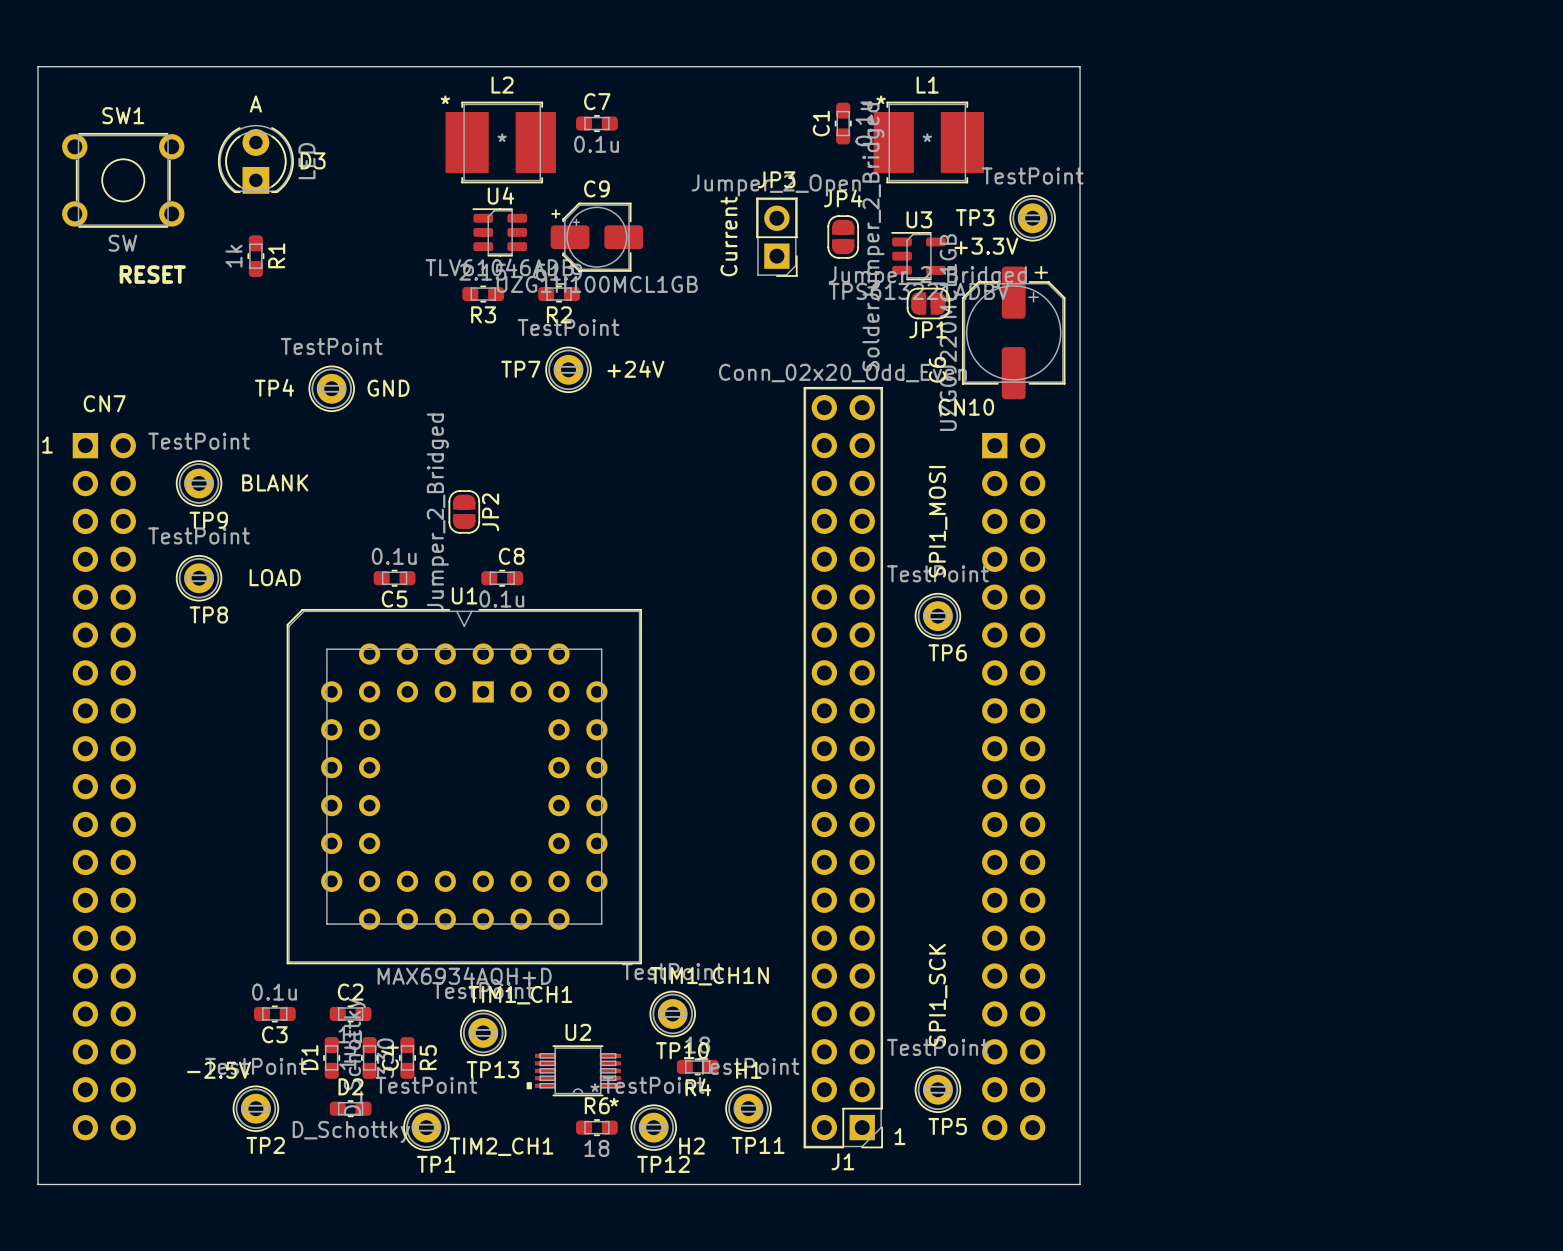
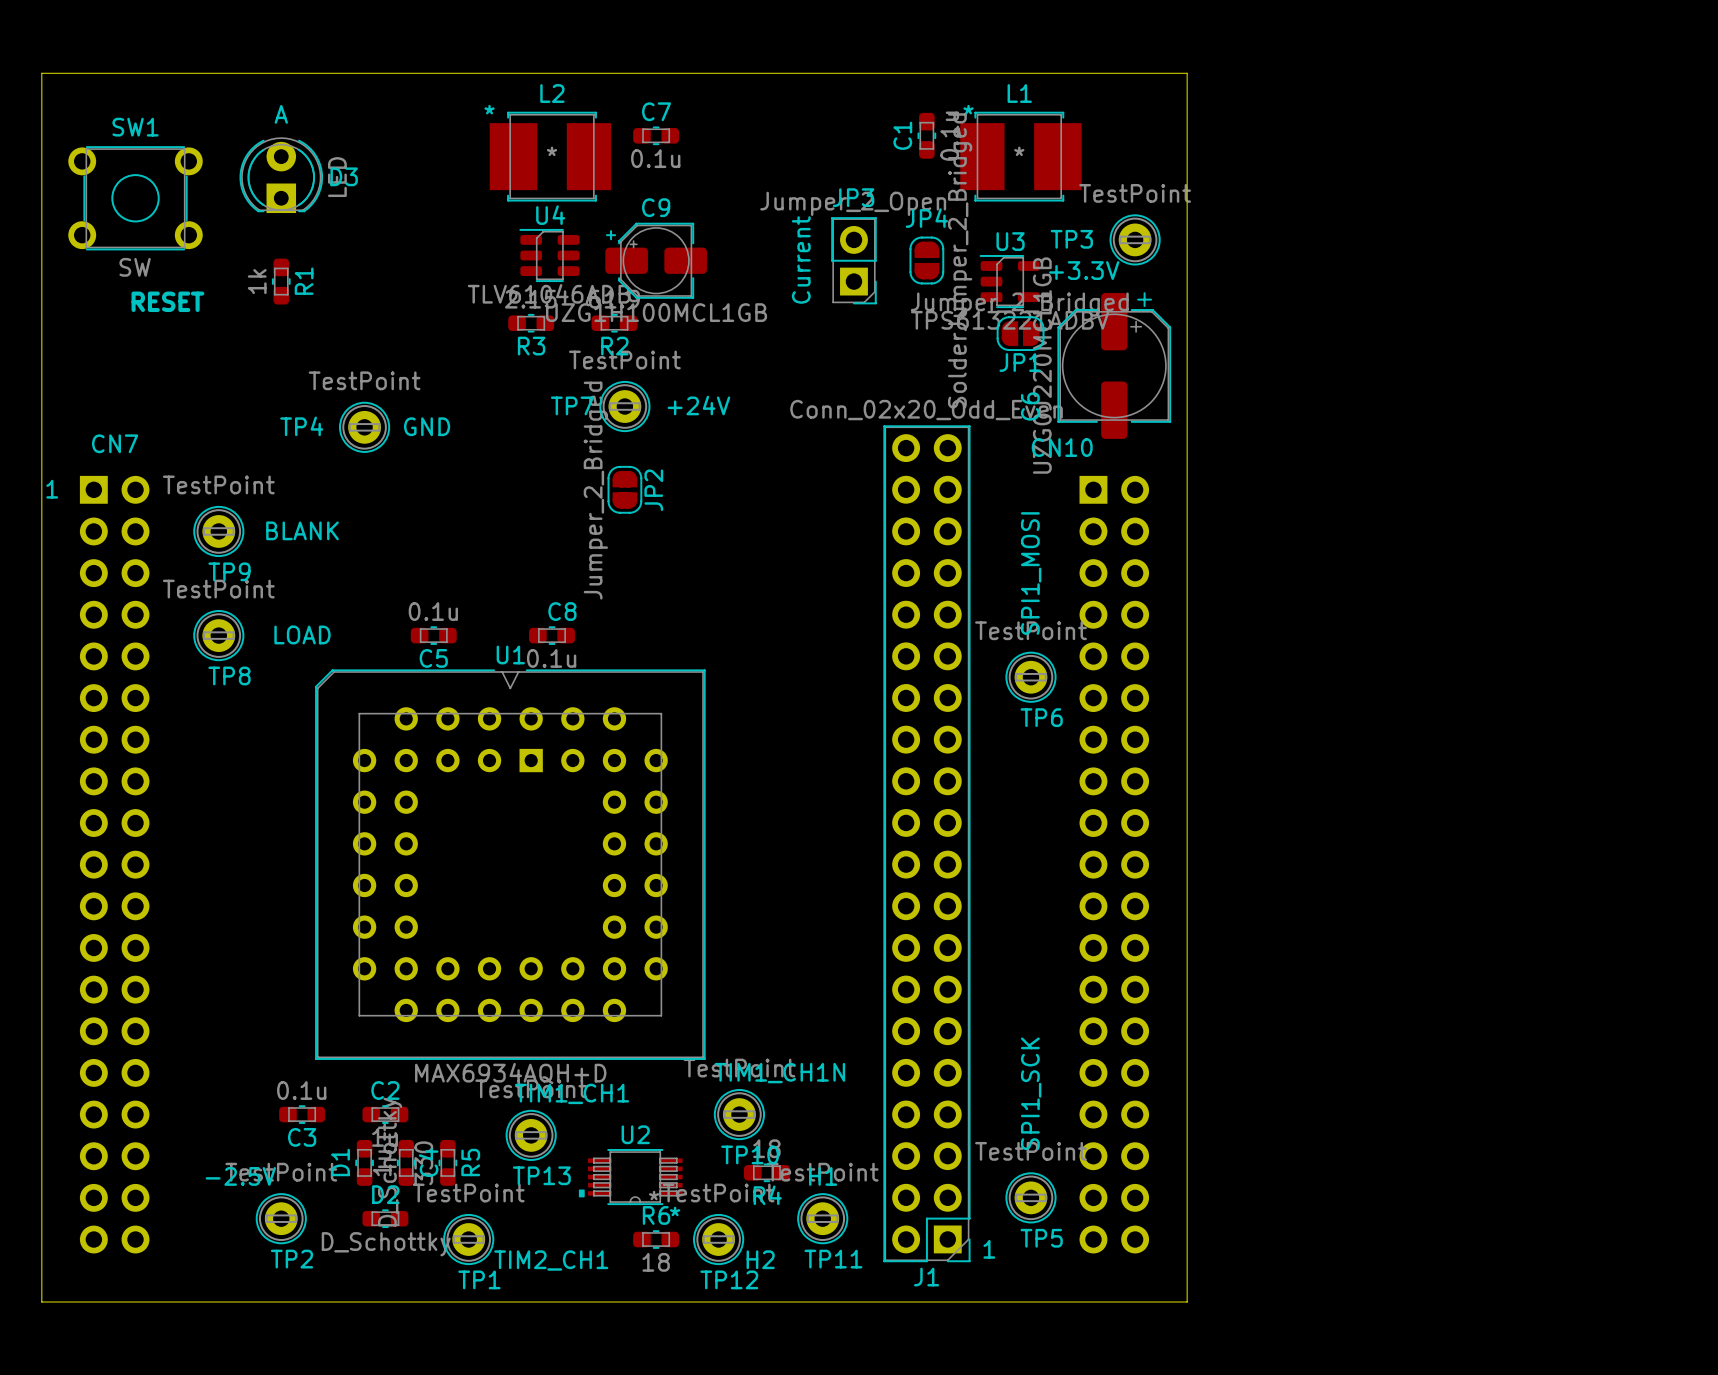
JP2 position: (464, 511) -> (624, 489)

